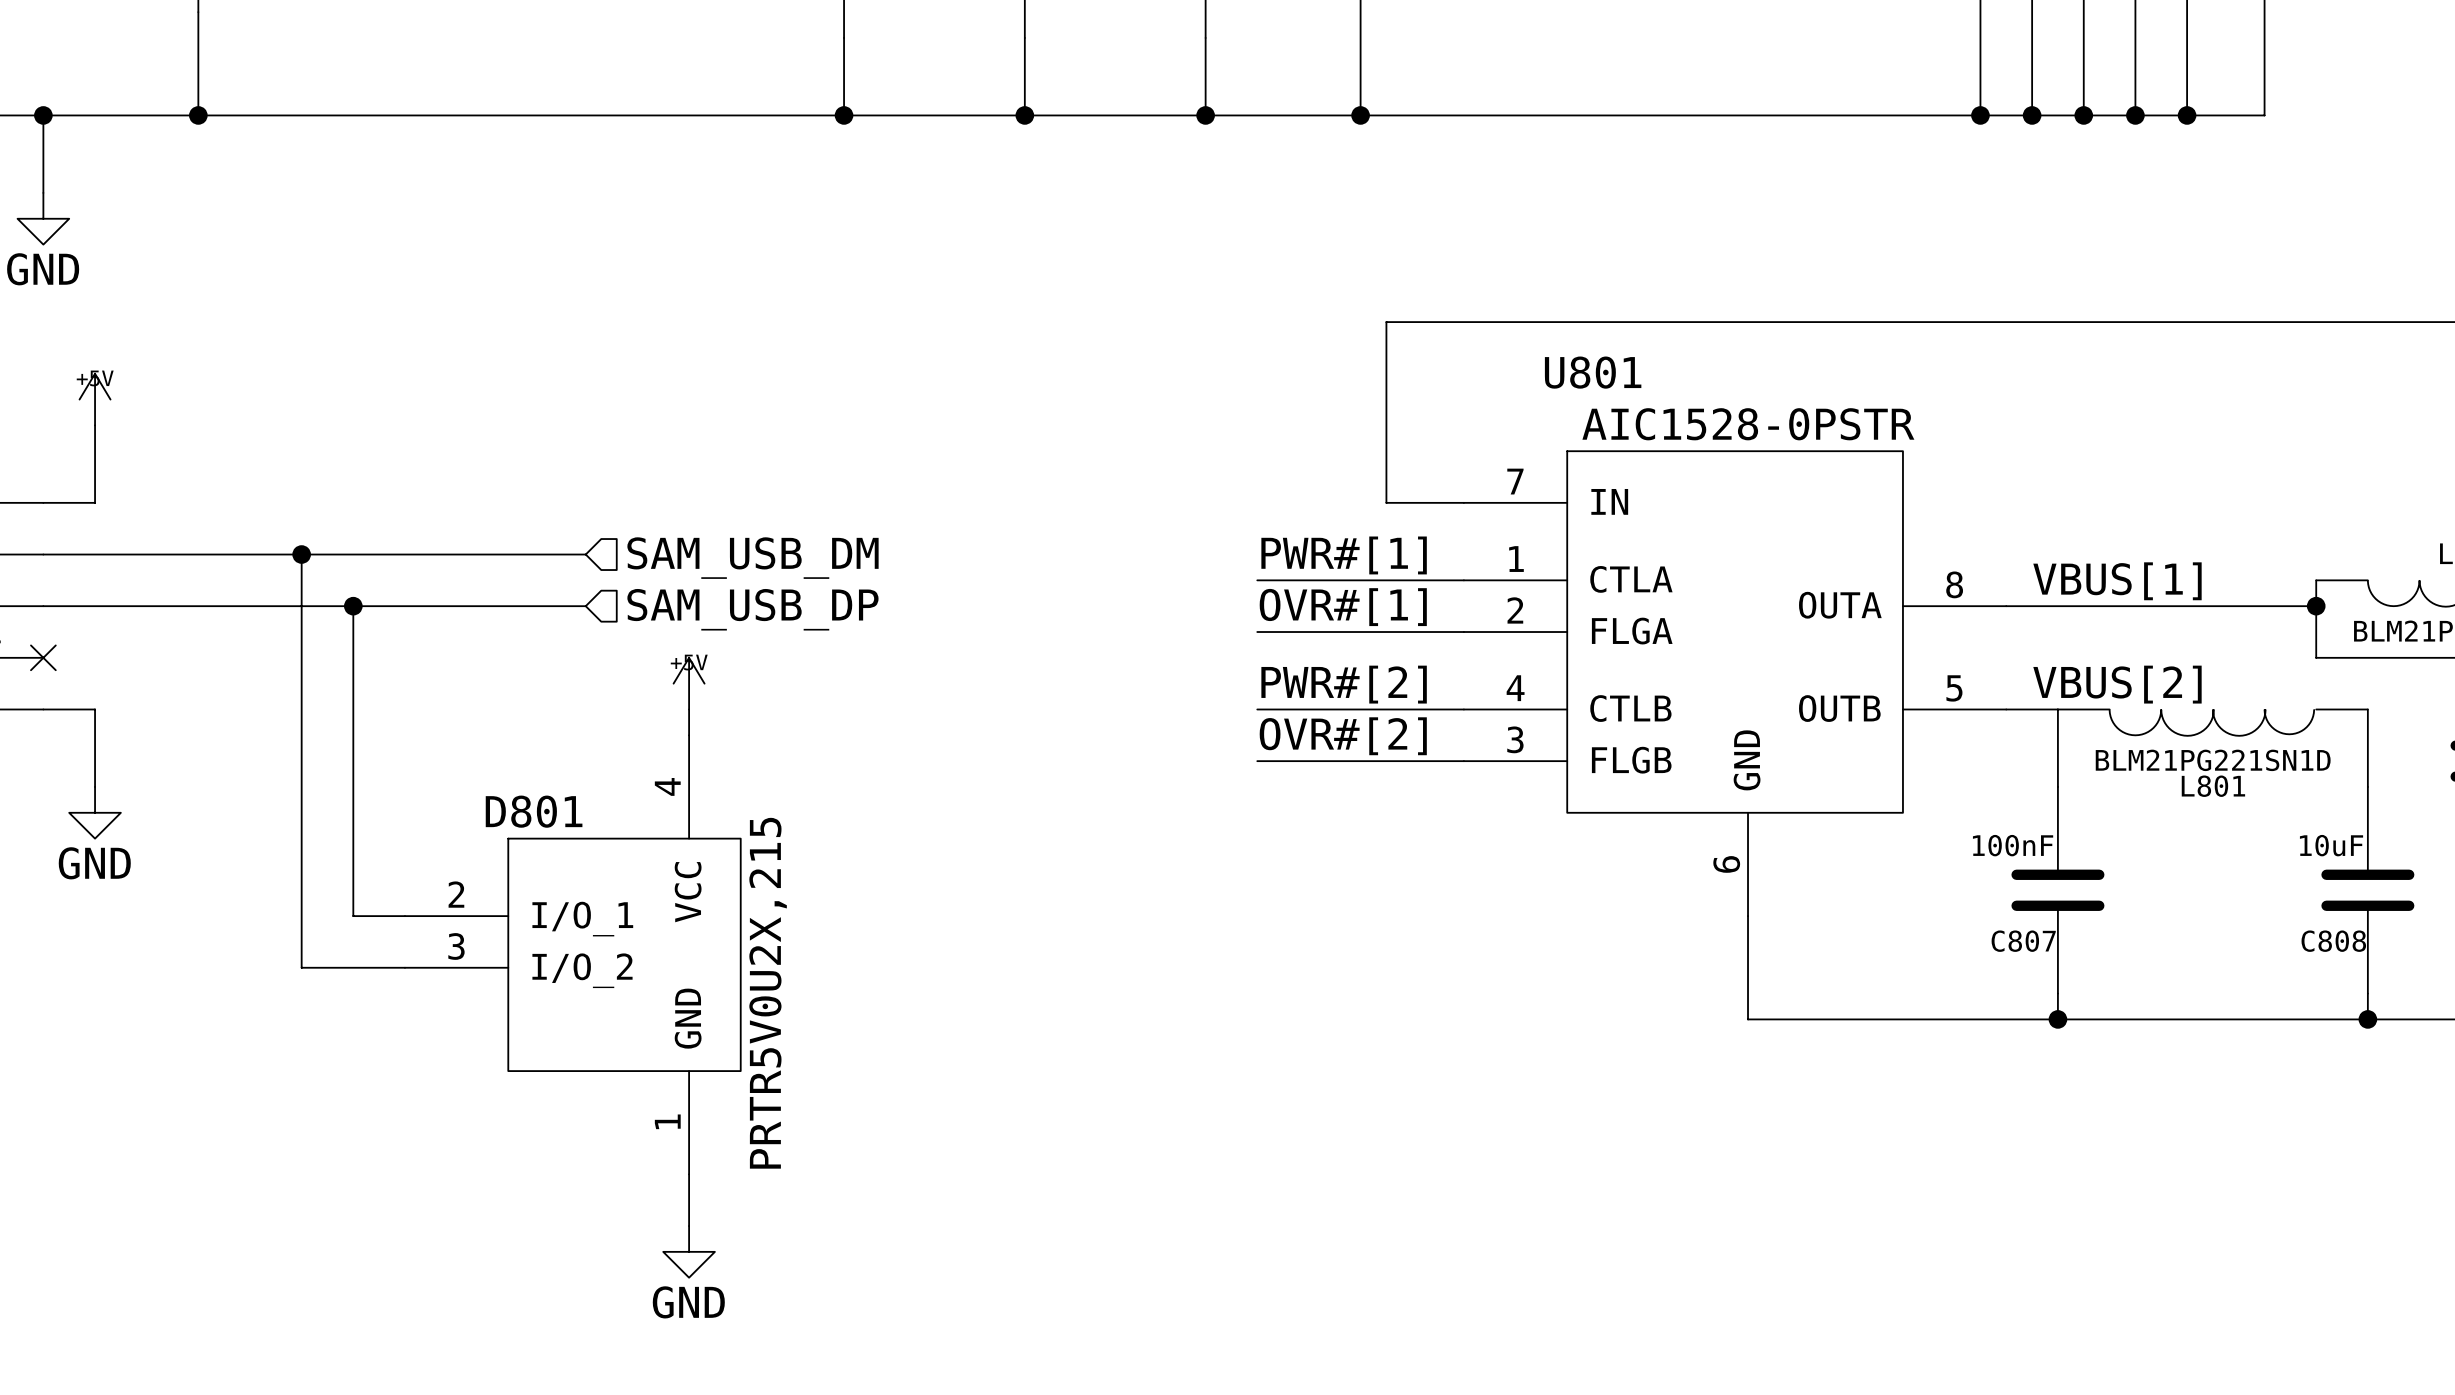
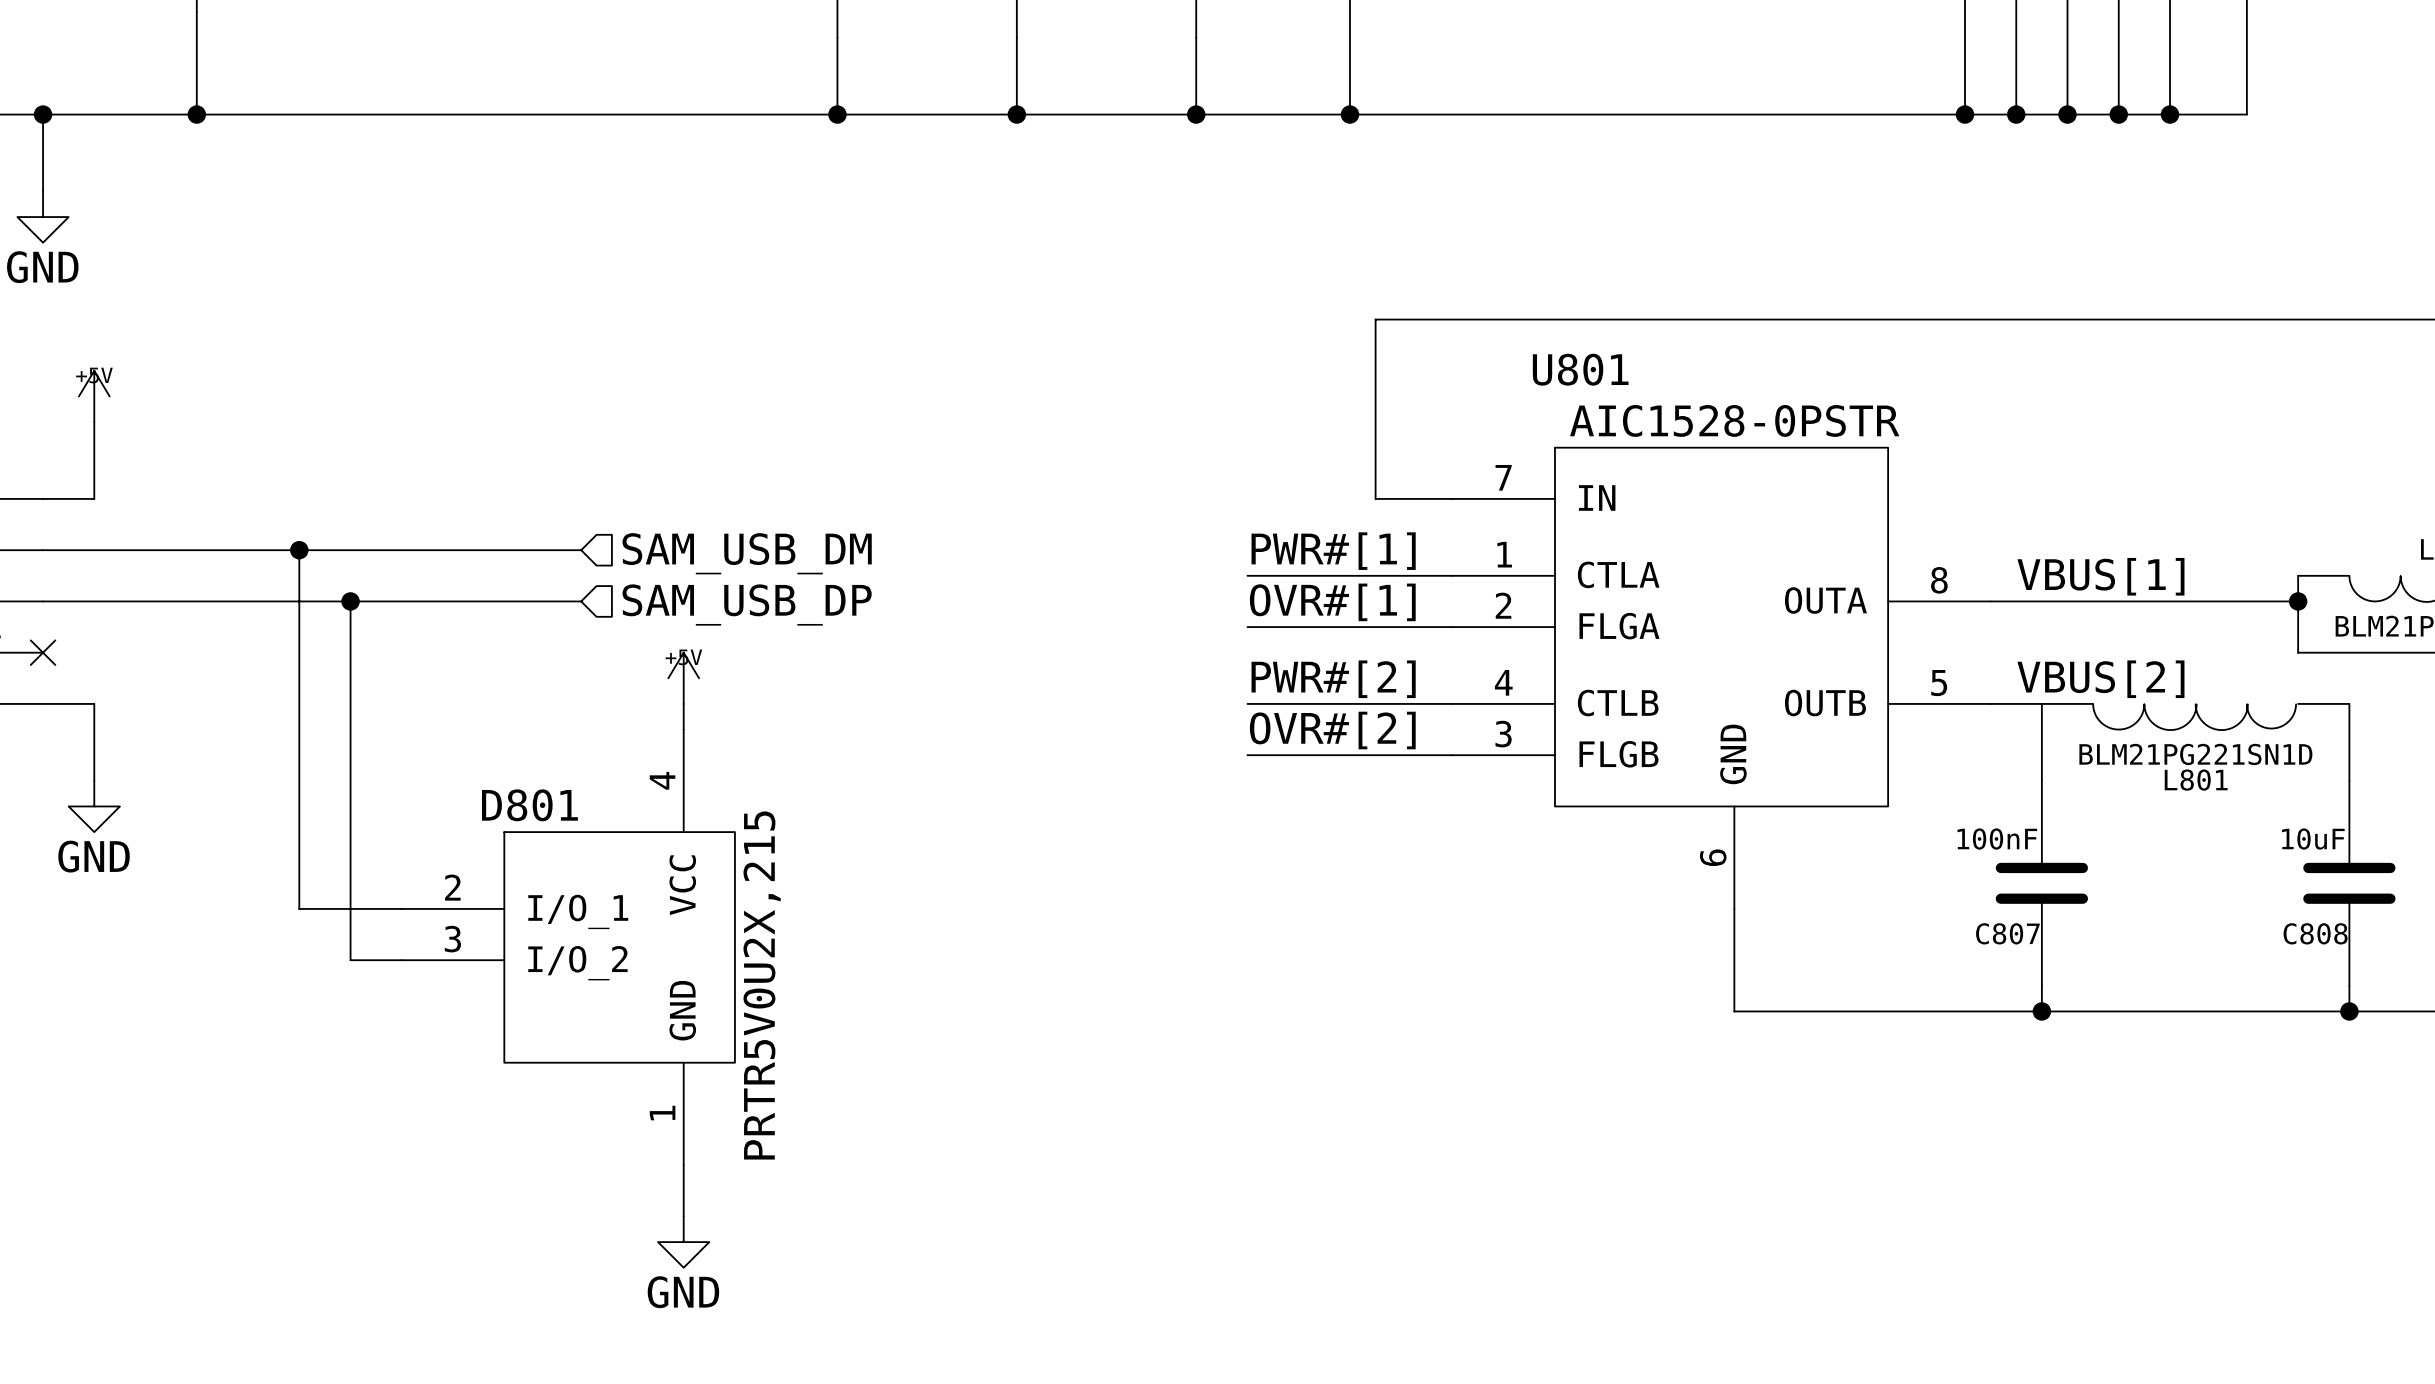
wire: (301, 916) (301, 967) (353, 967) -> (299, 908) (350, 908) (350, 960)

